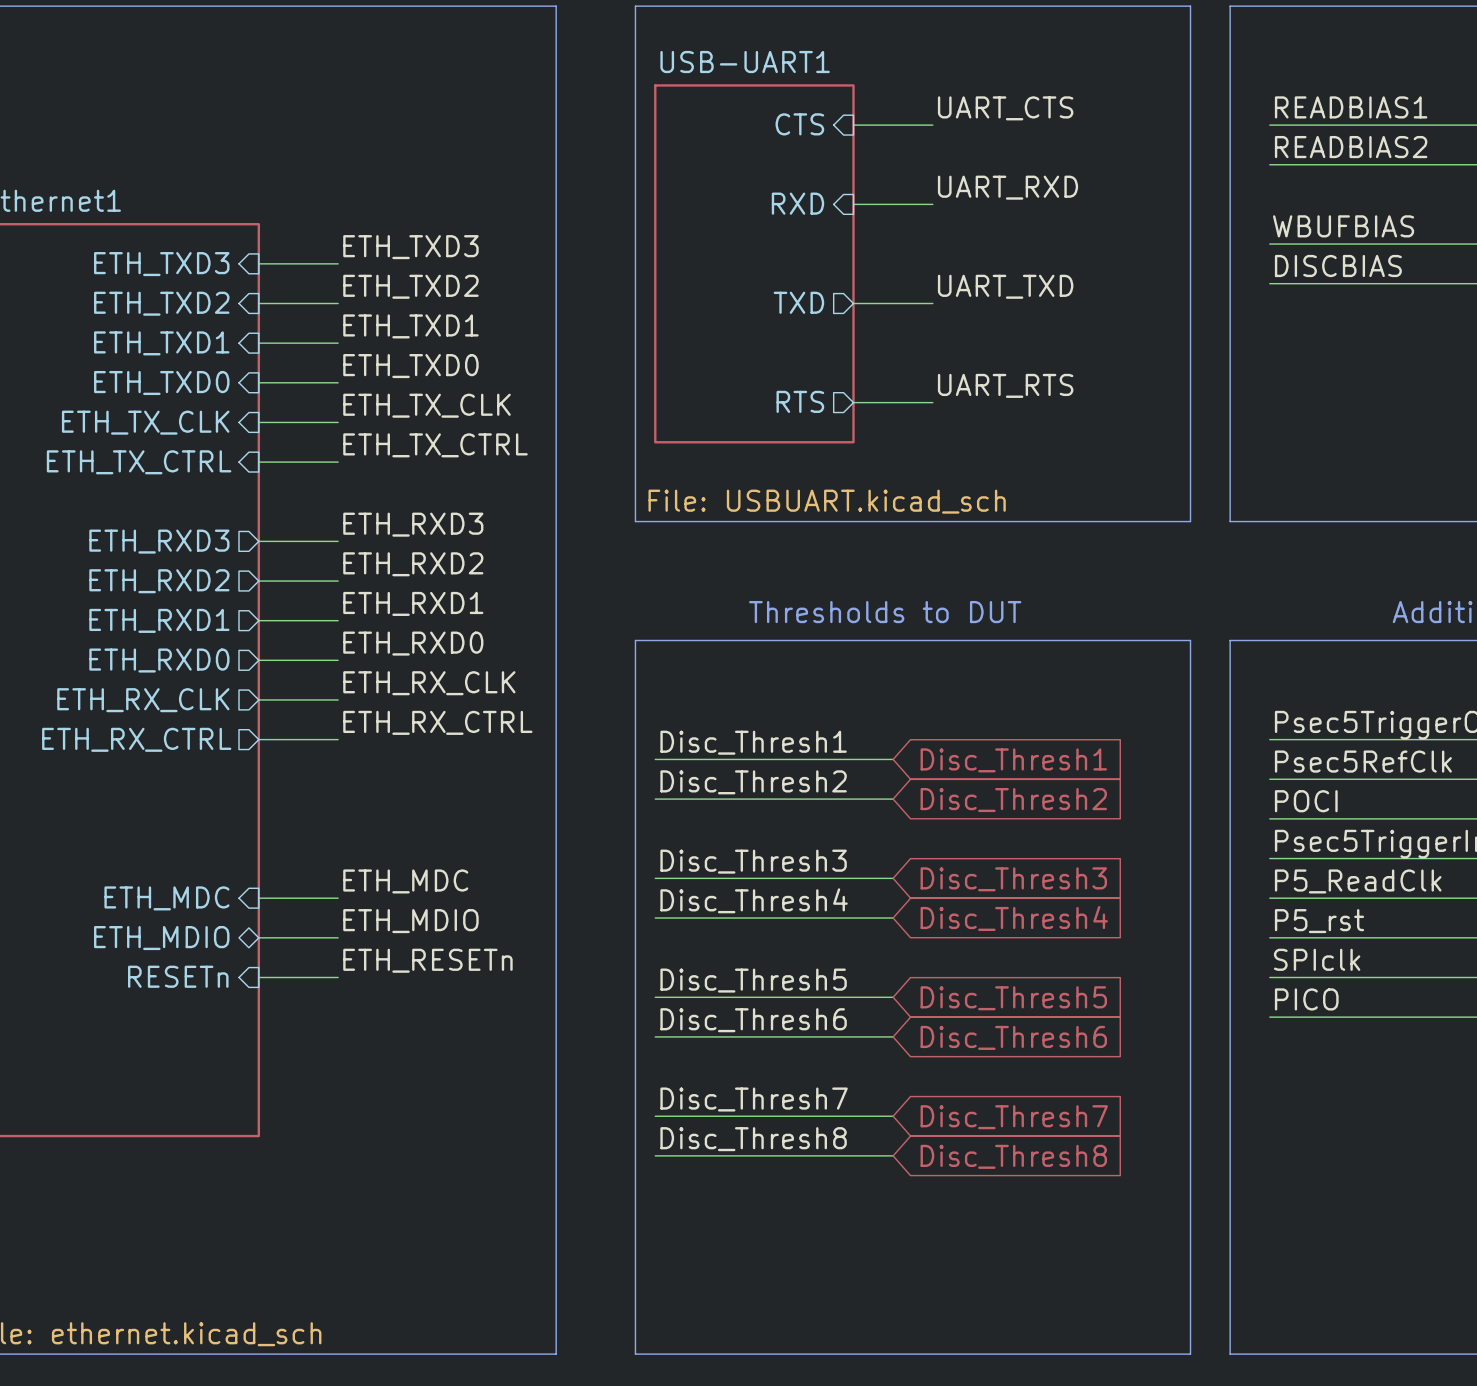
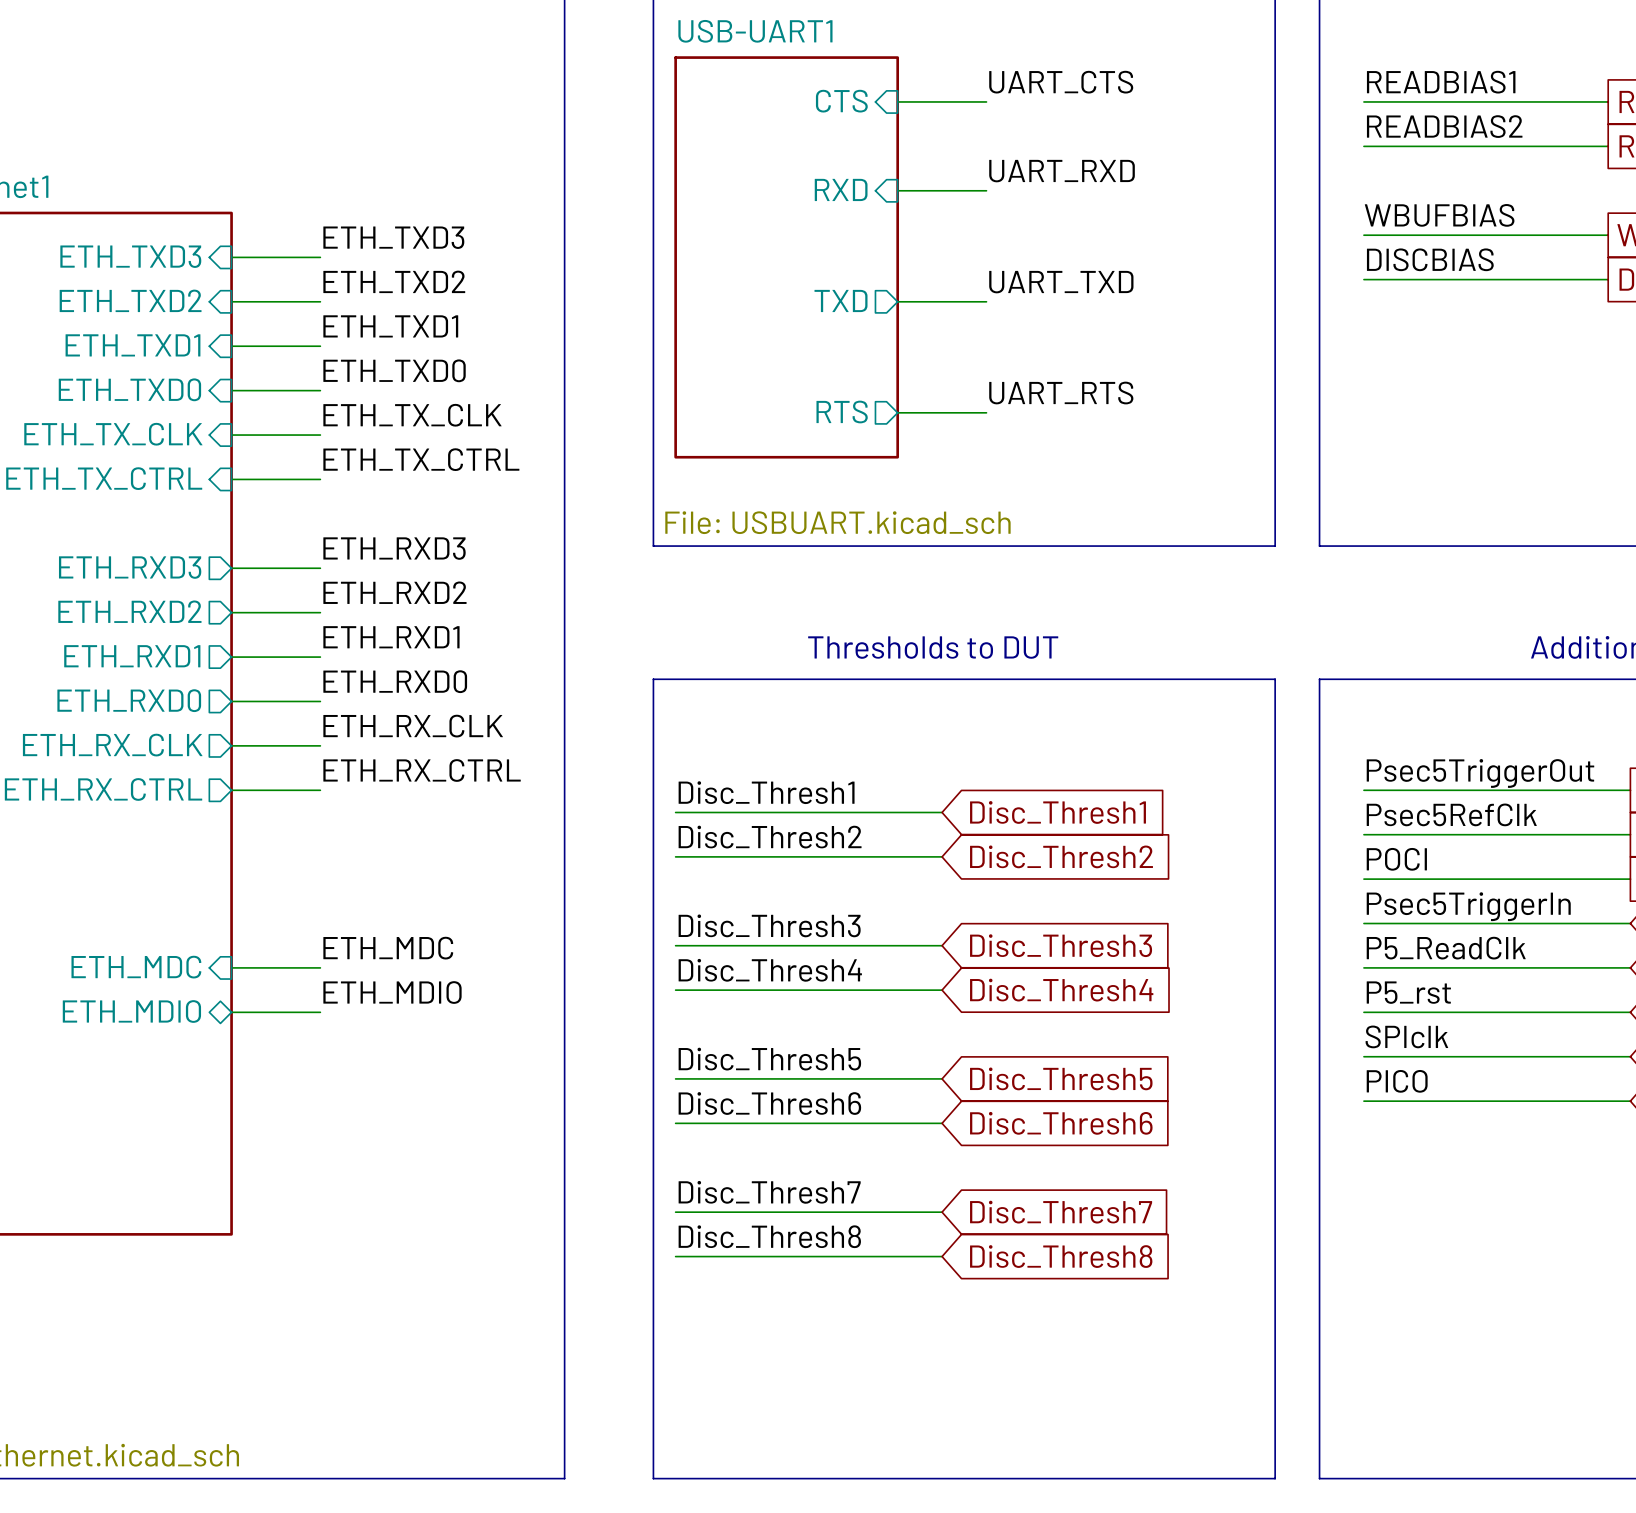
label: ETH_RESETn (427, 960) -> none
sheet pin: RESETn (178, 976) -> none
wire: (258, 977) (338, 977) -> none

